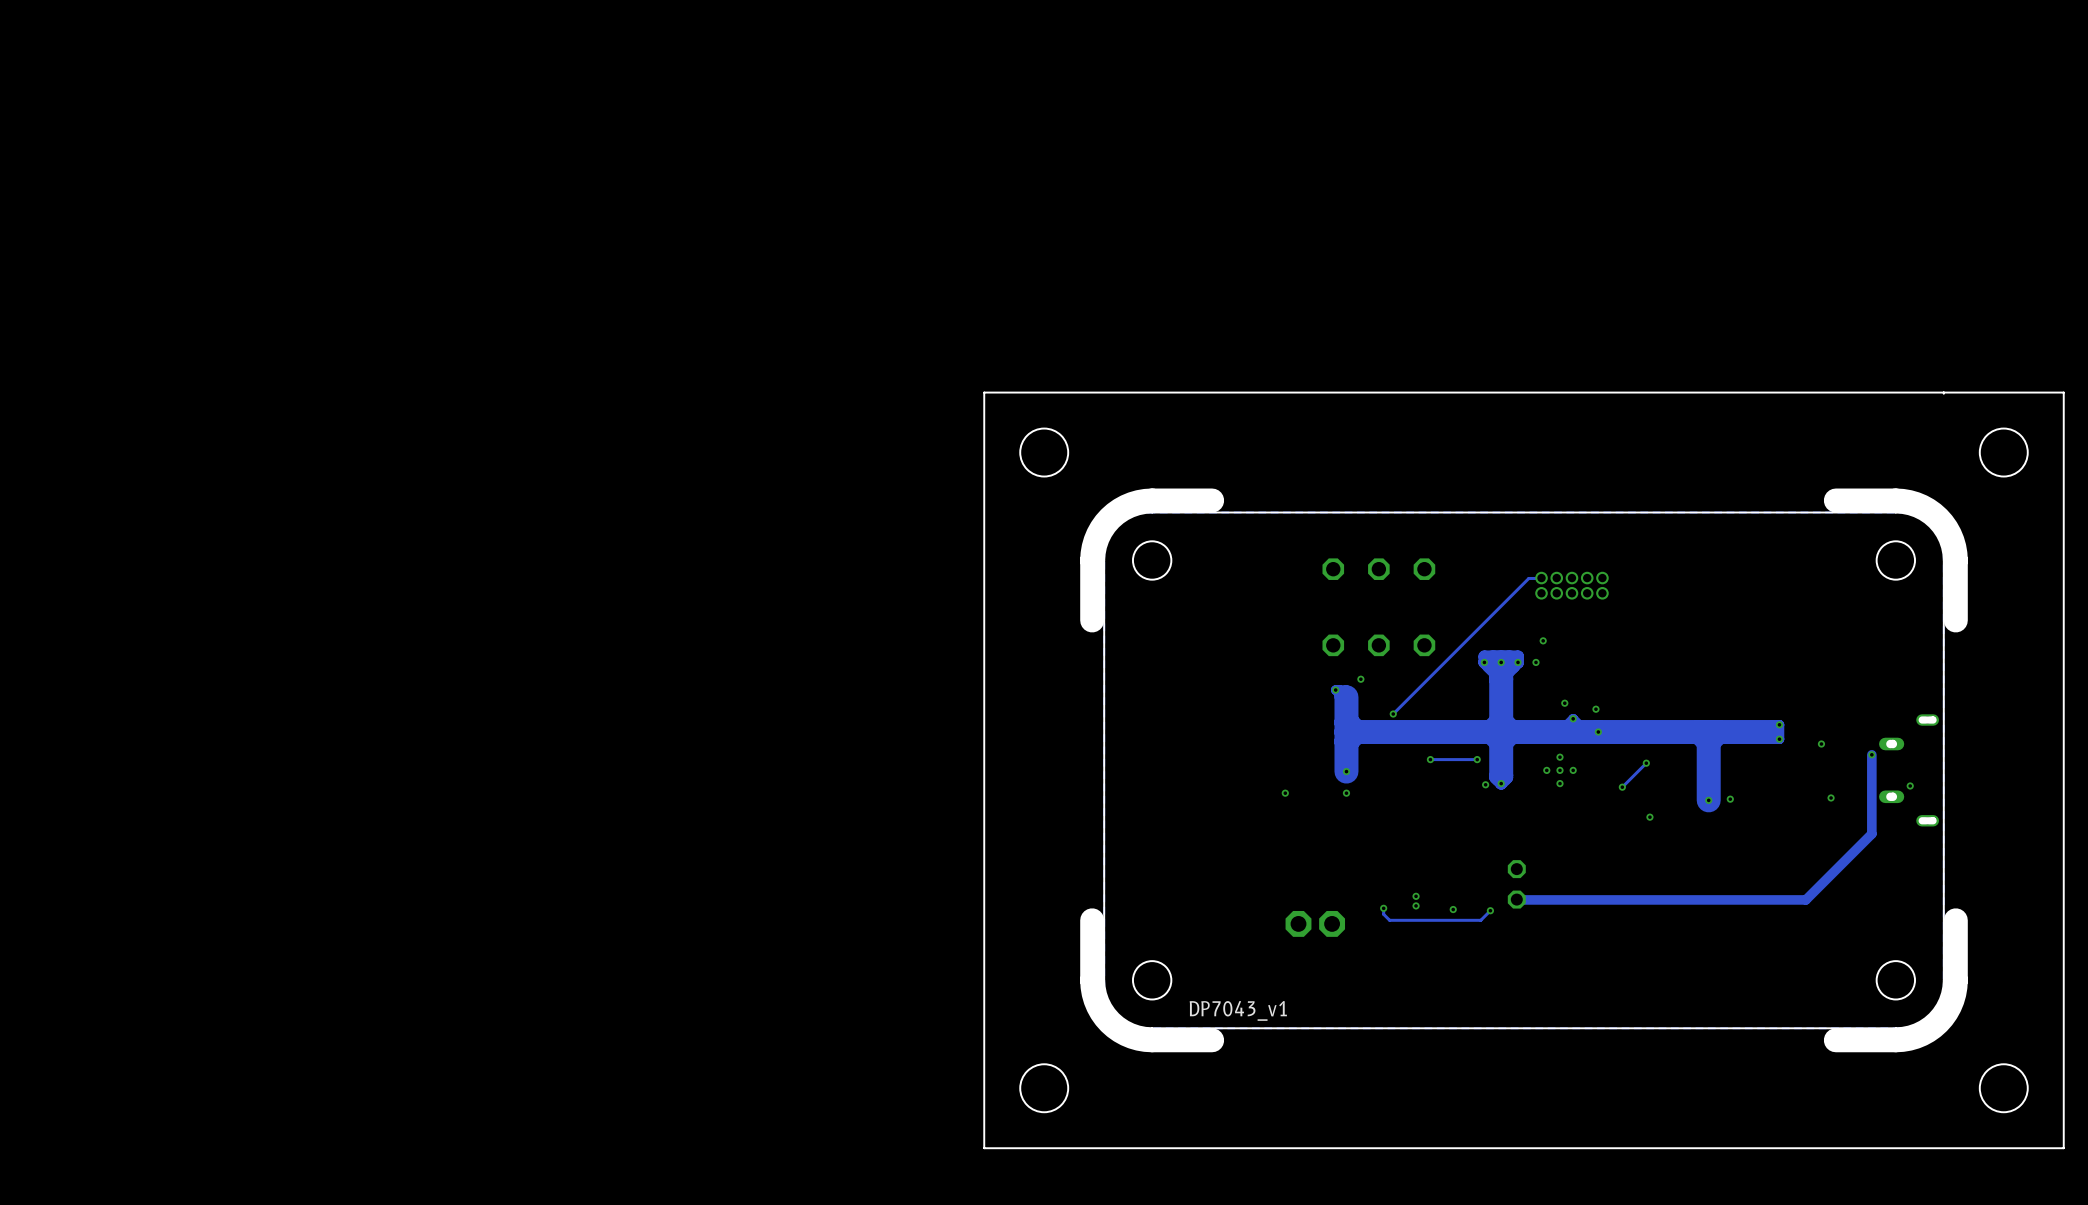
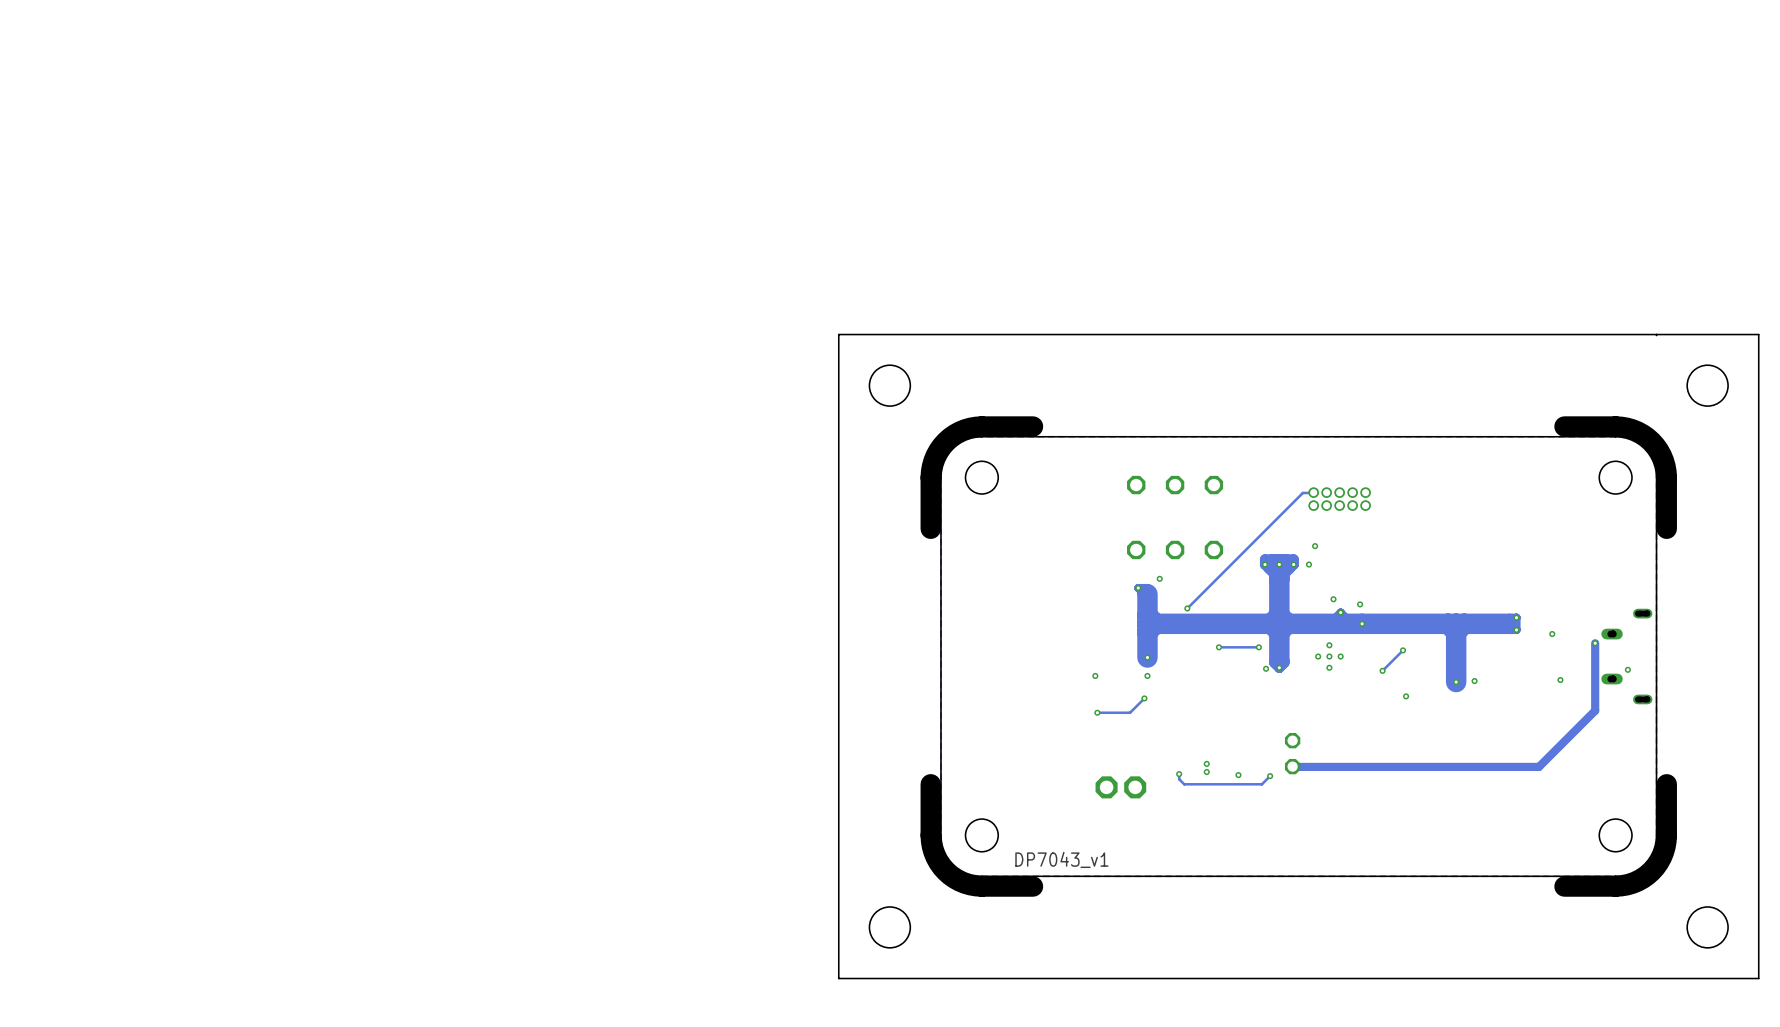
track: none -> (1144, 698) (1130, 712) (1097, 712)
via: none -> (1144, 698)
via: none -> (1097, 712)

